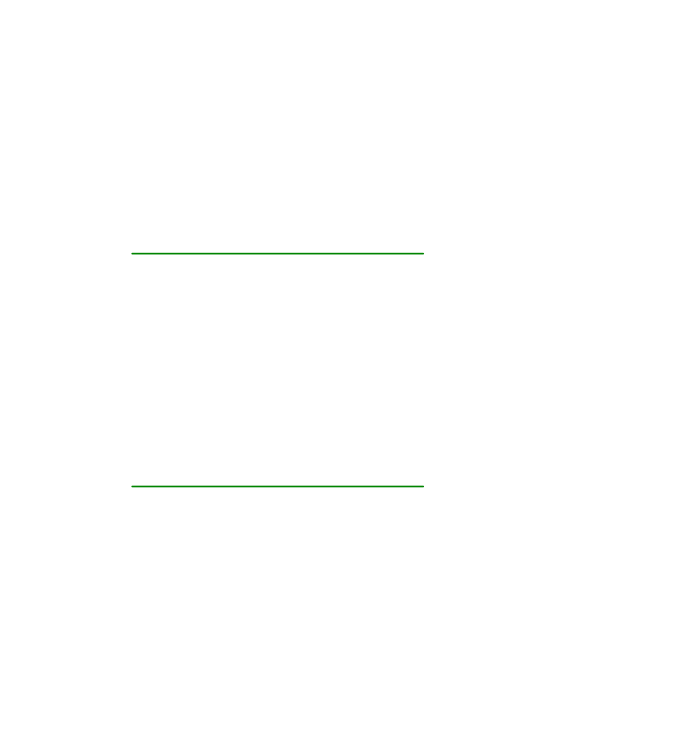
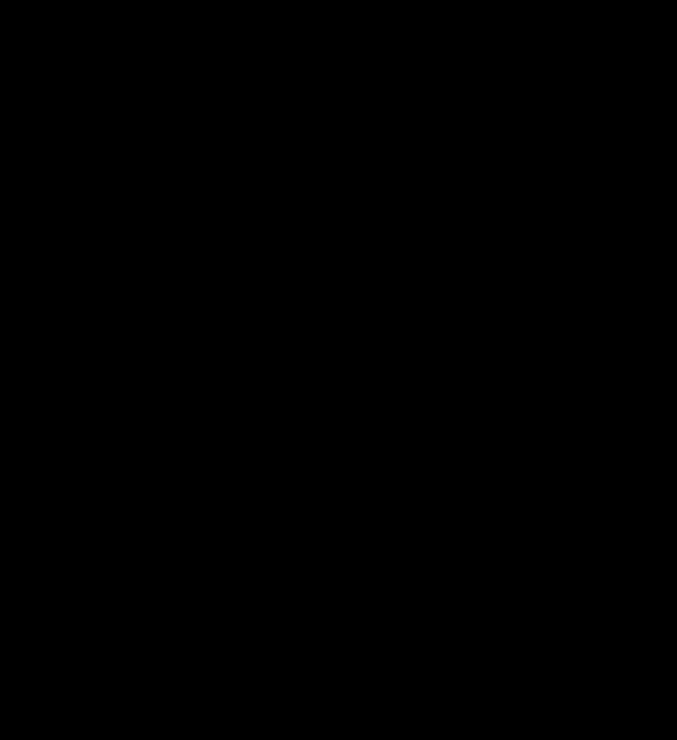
wire: (132, 253) (423, 253) -> none
wire: (132, 486) (423, 486) -> none

